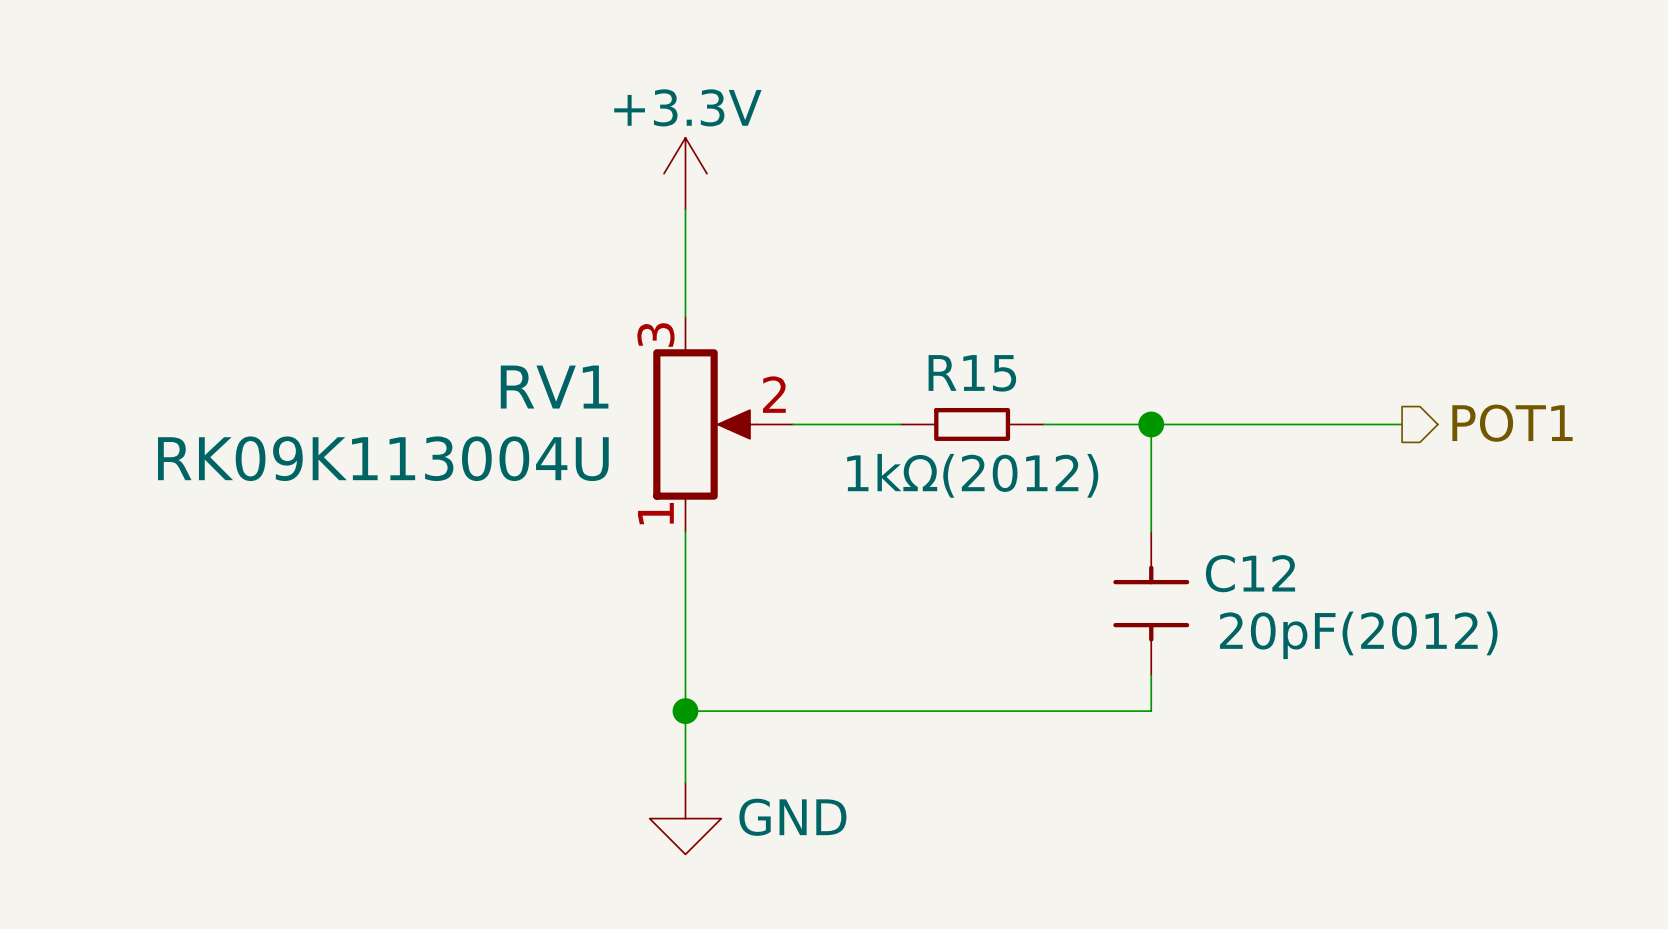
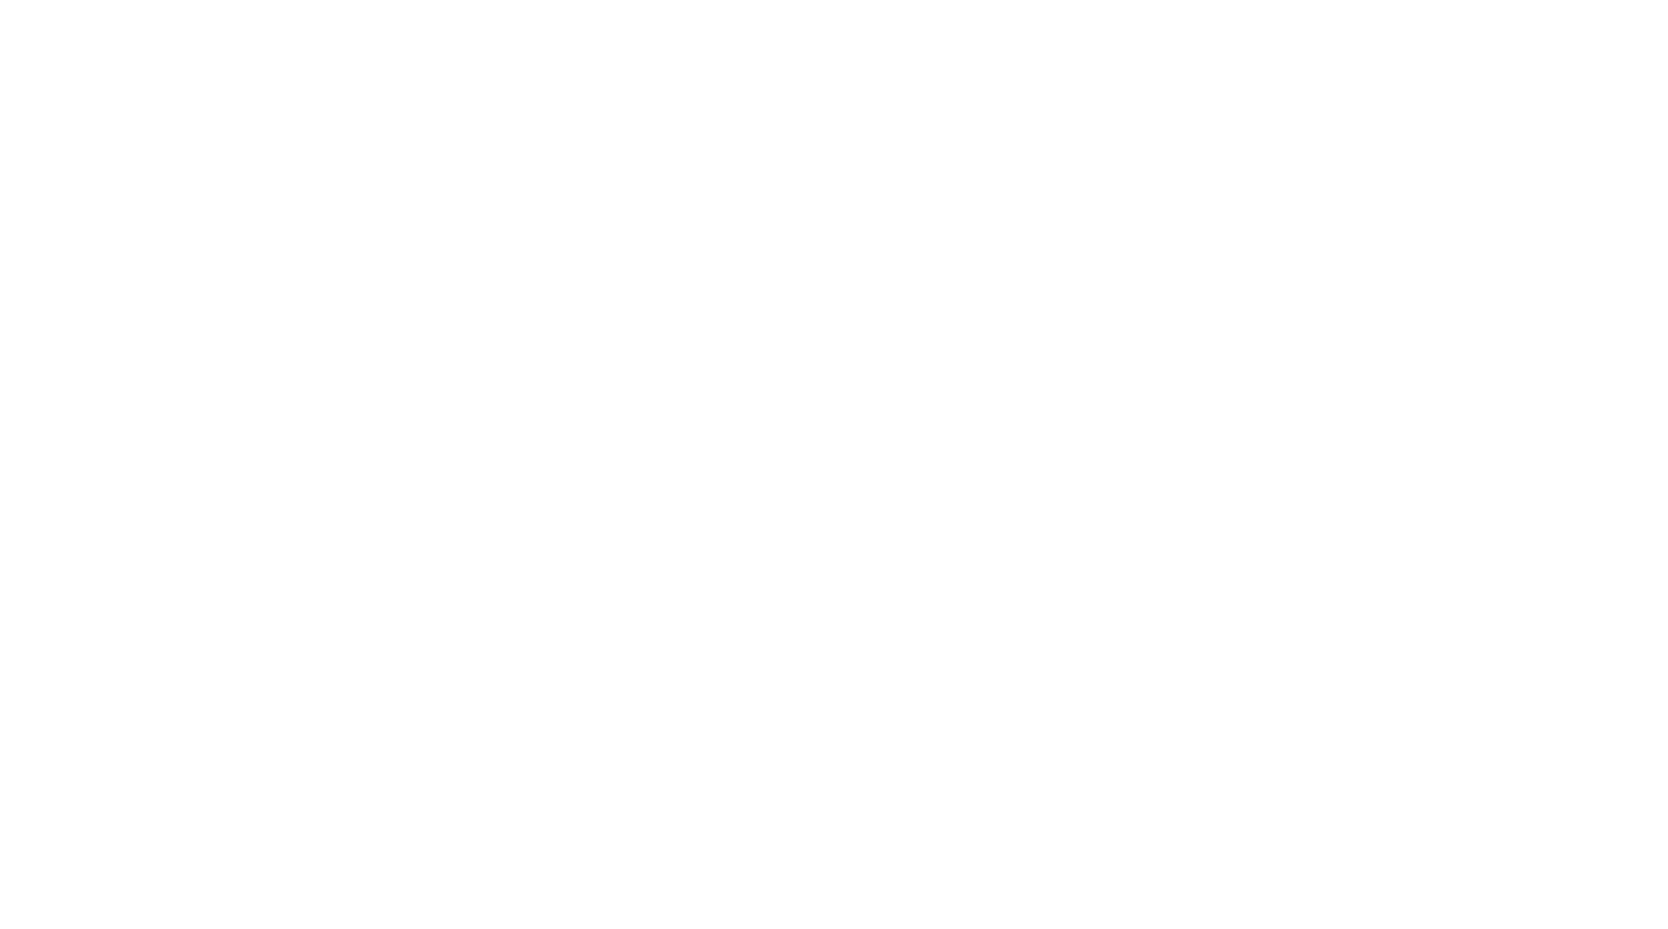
power symbol: +3.3V (685, 173) -> none
wire: (685, 209) (685, 317) -> none
hierarchical label: POT1 (1512, 423) -> none
RV1: RK09K113004U (723, 424) -> none
wire: (792, 424) (900, 424) -> none
R15: 1kΩ(2012) (972, 424) -> none
wire: (1043, 424) (1402, 424) -> none
wire: (1151, 424) (1151, 531) -> none
junction: (1151, 424) -> none
wire: (685, 531) (685, 782) -> none
C12: 20pF(2012) (1151, 603) -> none
wire: (1151, 675) (1151, 711) (685, 711) -> none
junction: (685, 711) -> none
power symbol: GND (685, 818) -> none

